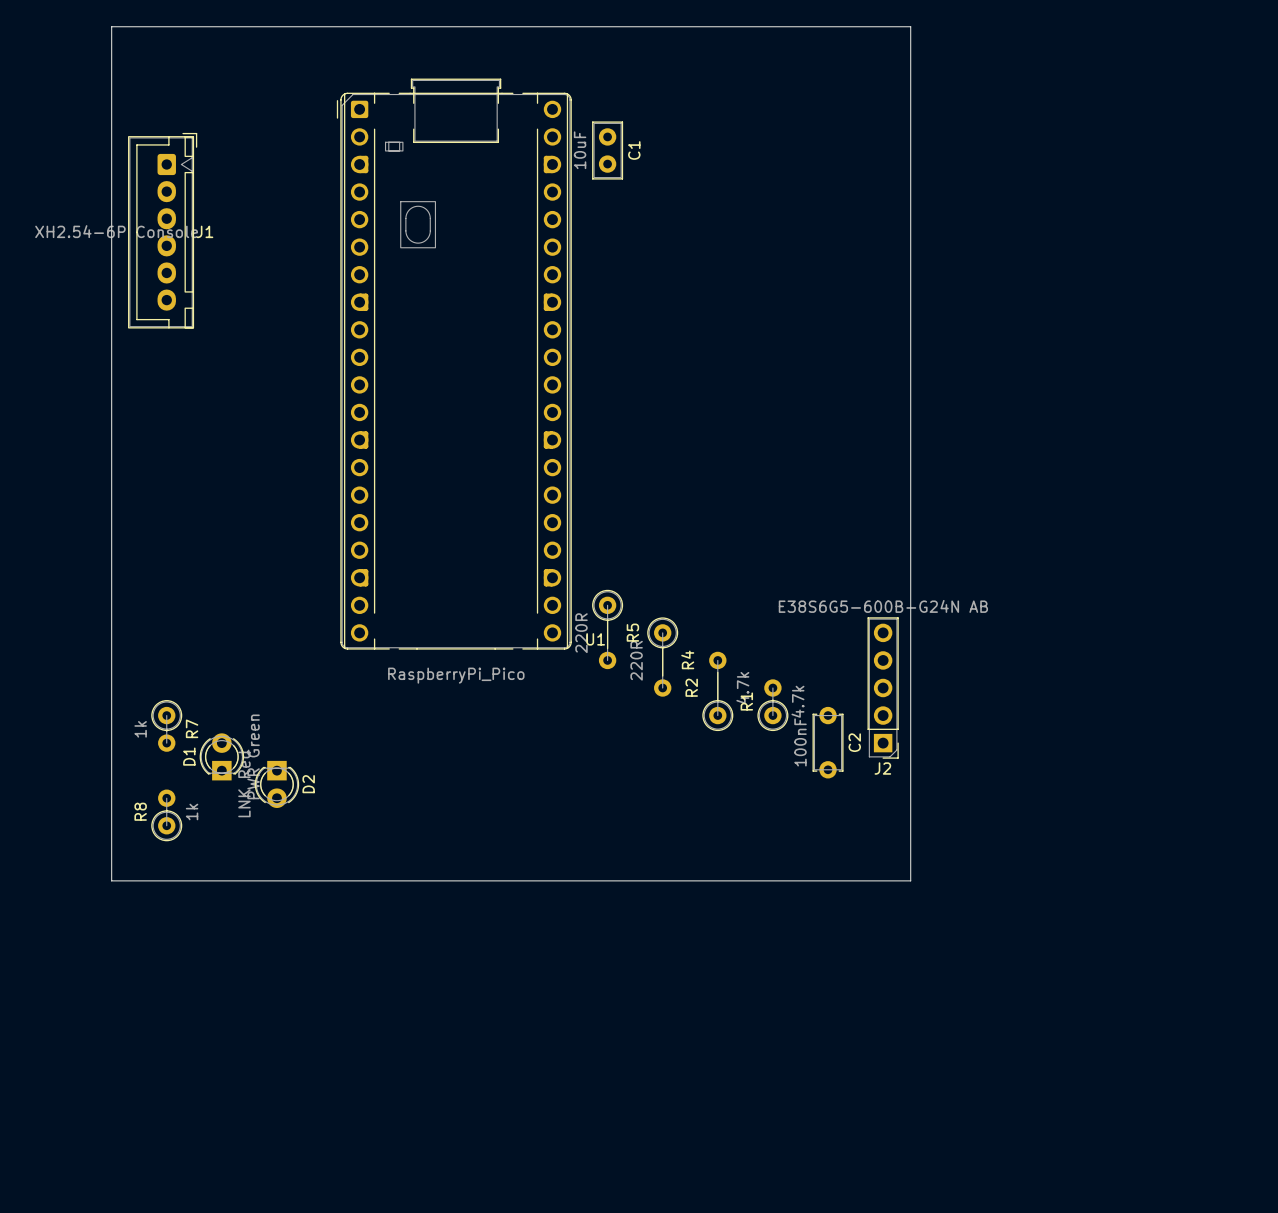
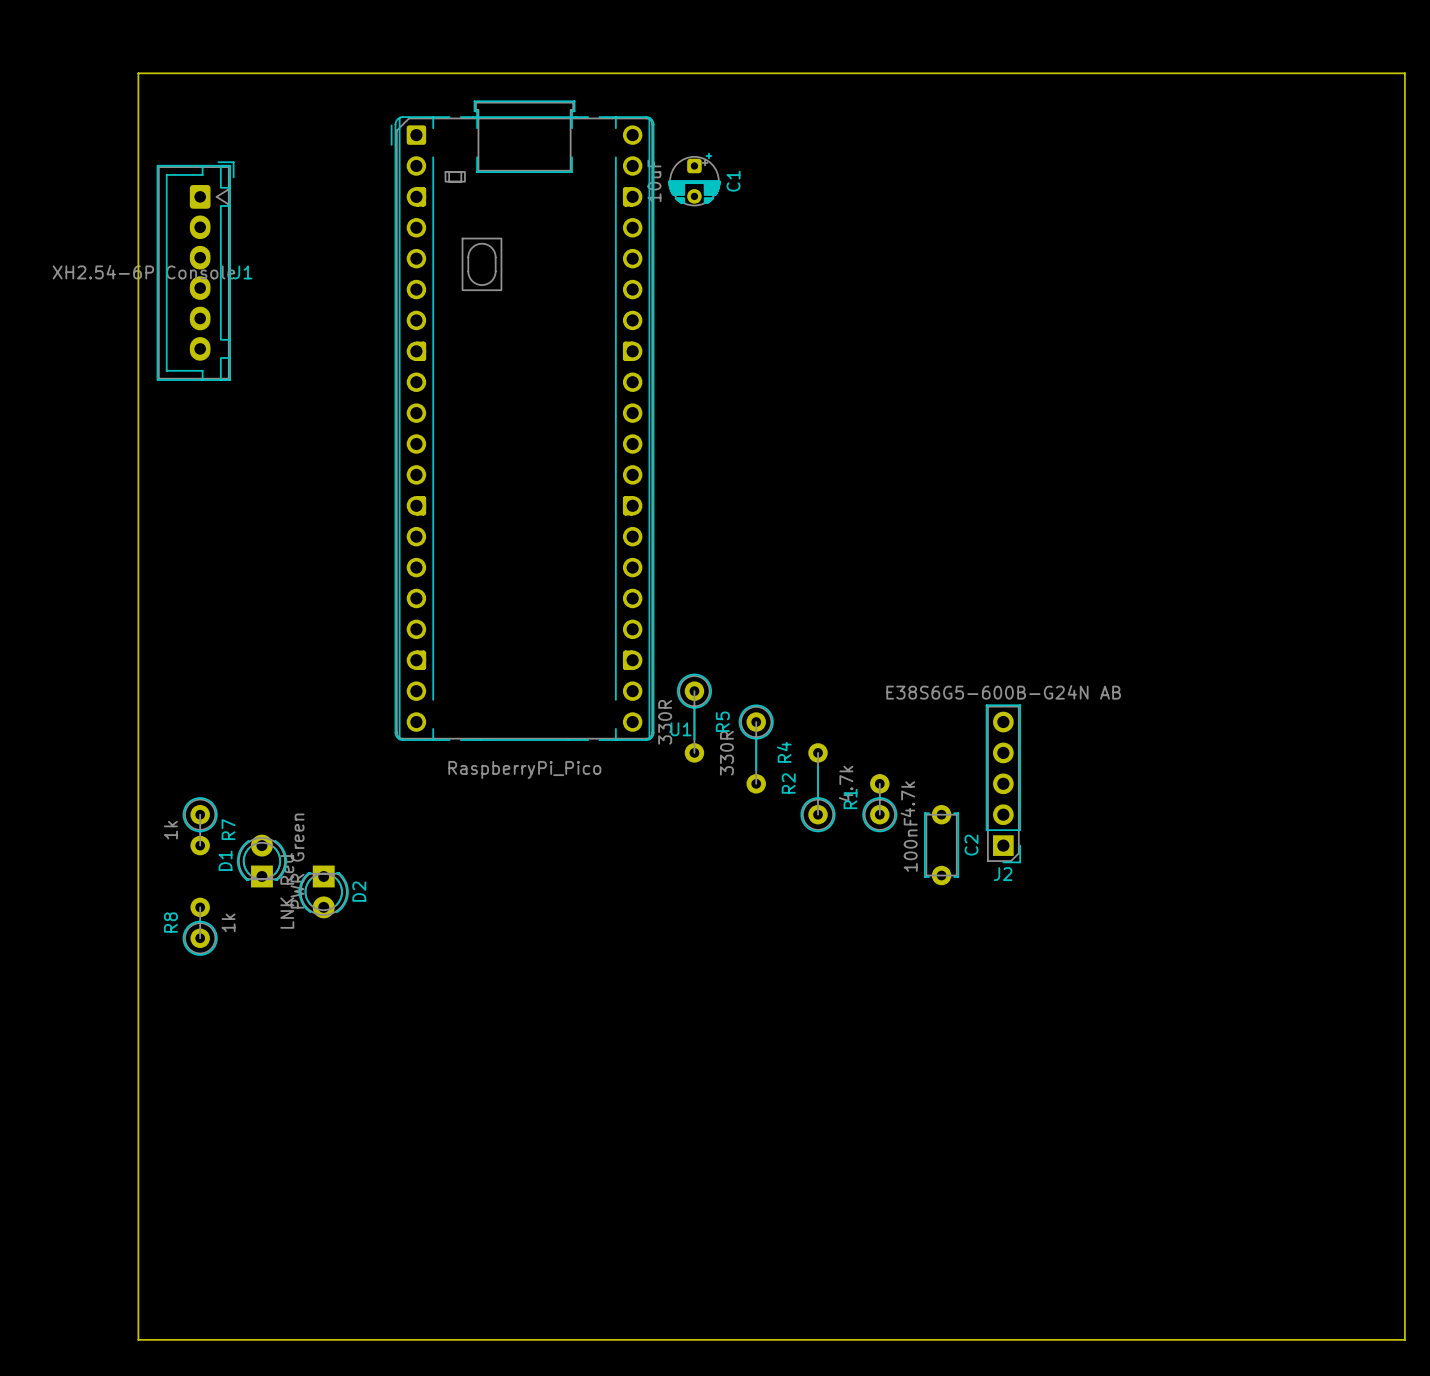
board edge: (111, 54) (111, 26) (910, 26) (910, 880) (111, 880) -> (138, 73) (1404, 73) (1404, 1339) (138, 1339) (138, 1000)
C1 footprint: [592, 121, 624, 180] -> [668, 152, 721, 207]
R5 value: 220R (581, 633) -> 330R (665, 722)
R4 value: 220R (636, 660) -> 330R (726, 753)

